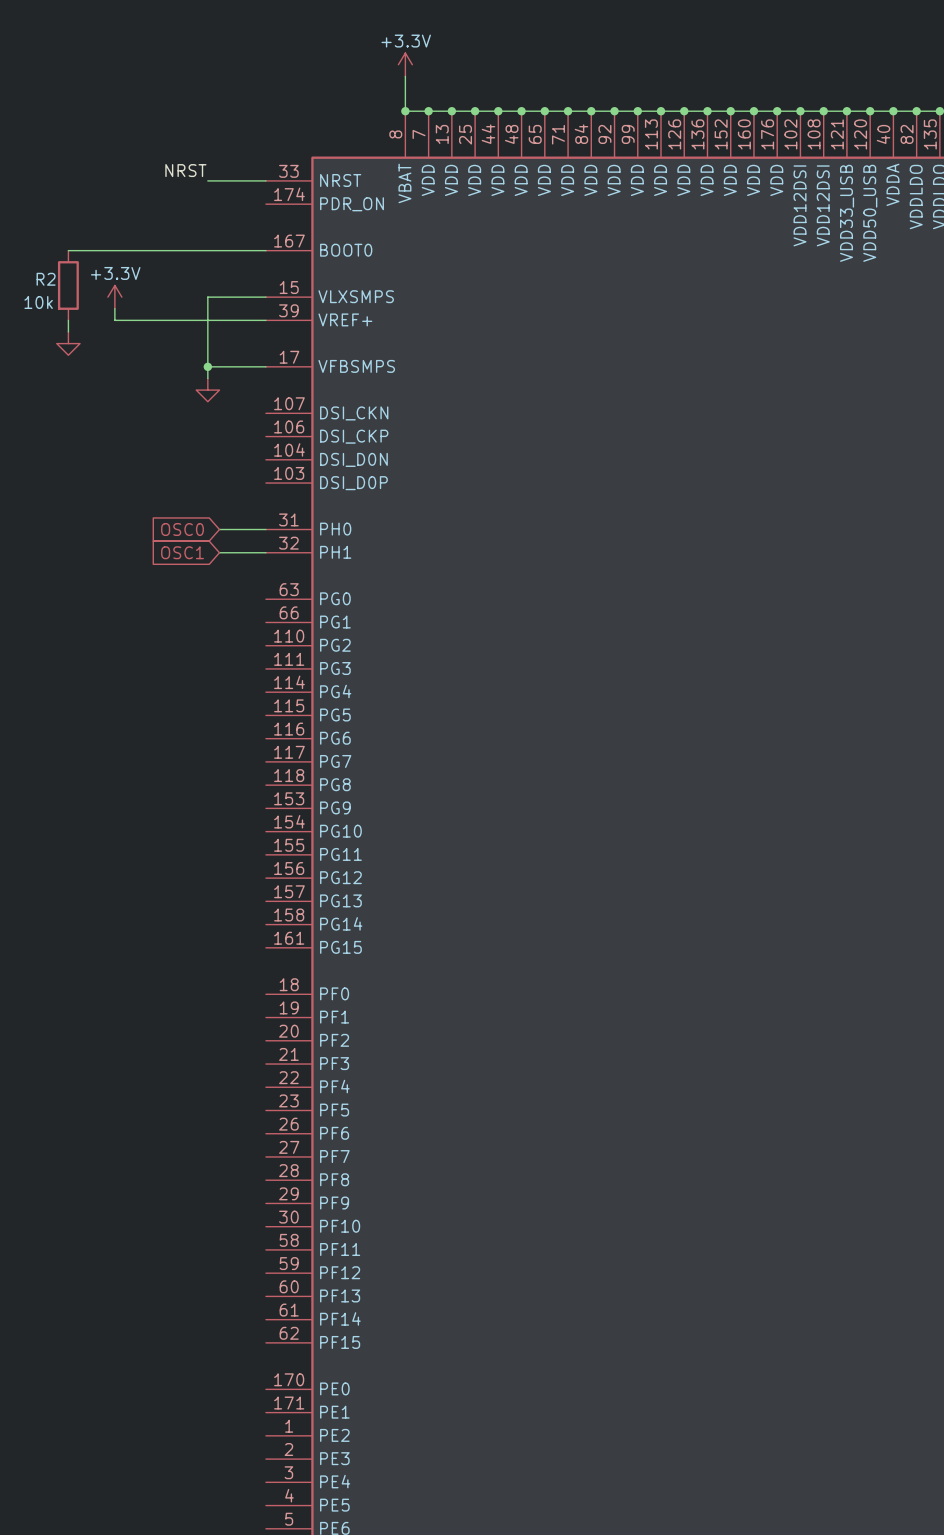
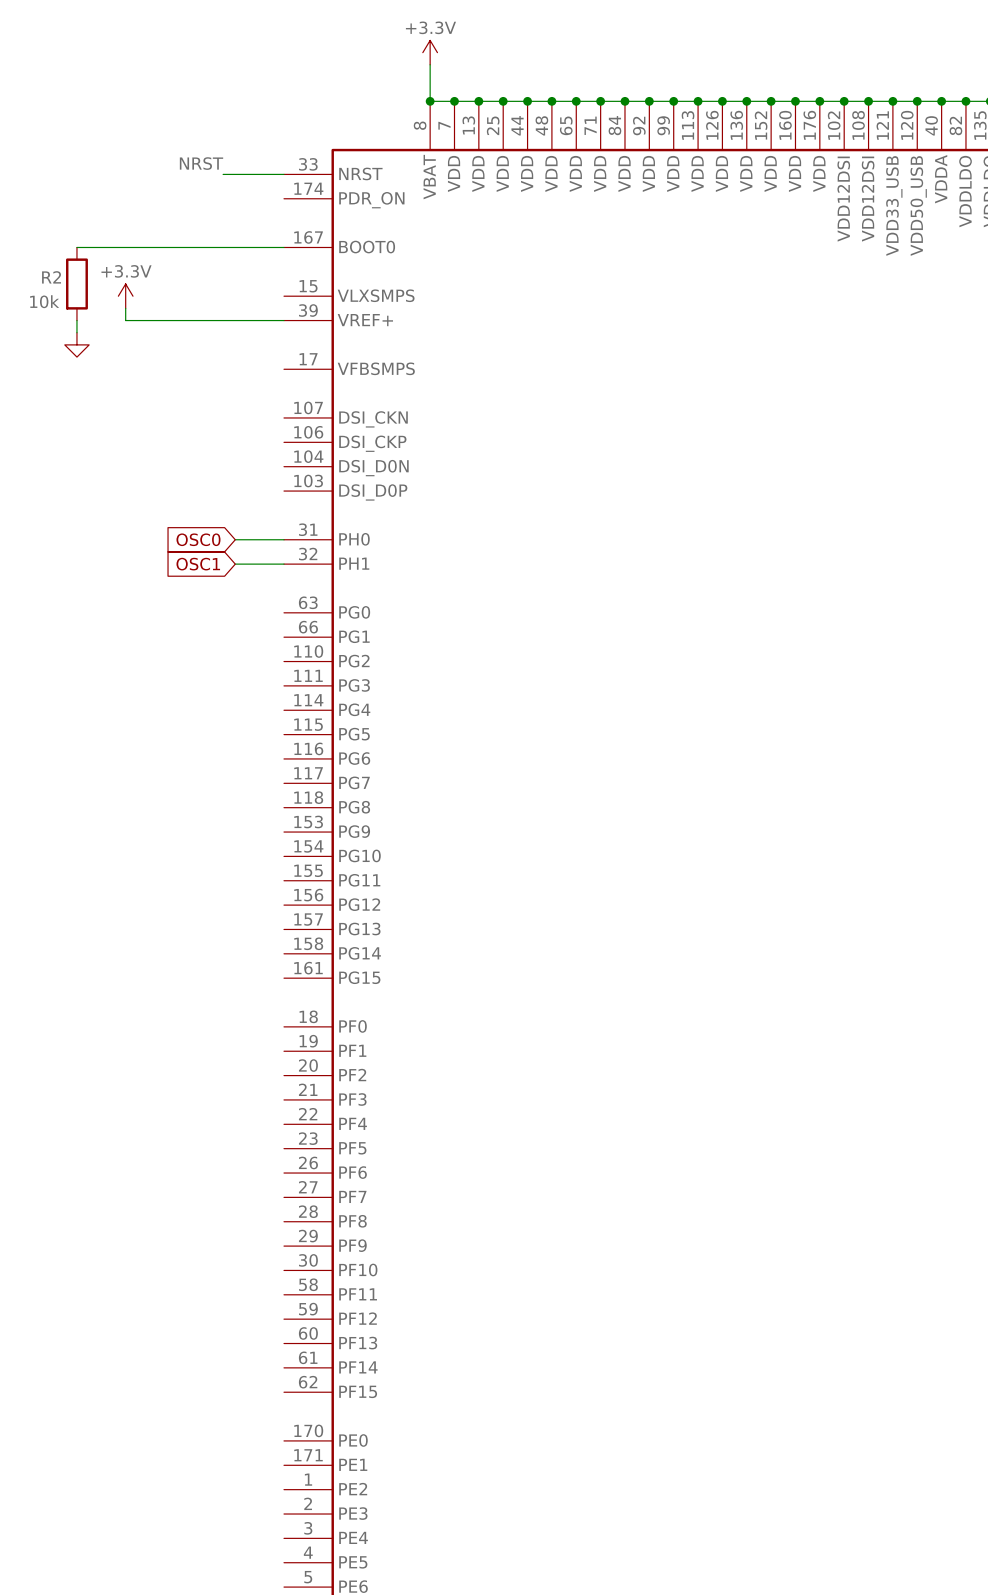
wire: (265, 297) (207, 297) (207, 378) -> none
wire: (207, 366) (265, 366) -> none
junction: (207, 366) -> none
power symbol: (207, 390) -> none

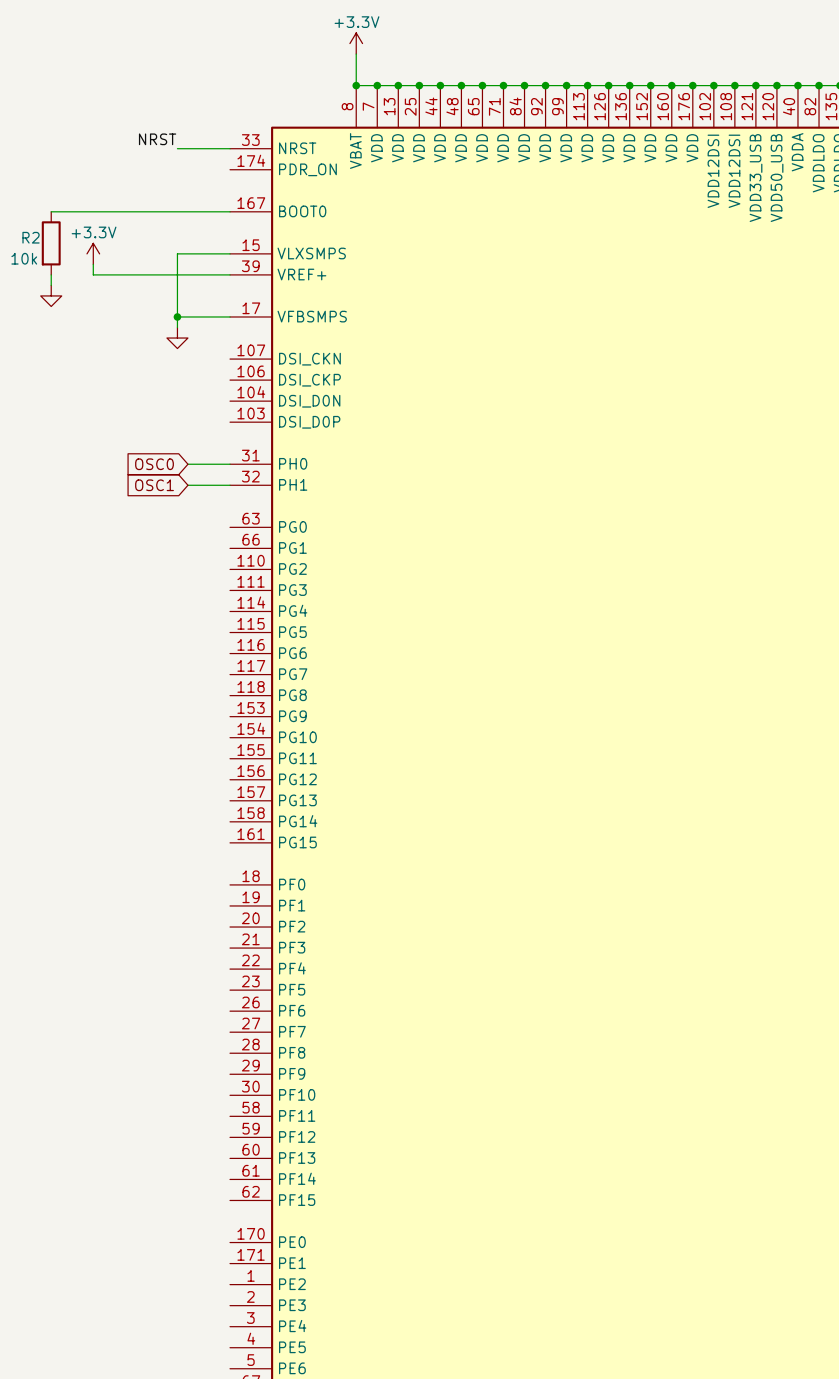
wire: none -> (230, 253) (177, 253) (177, 327)
wire: none -> (177, 316) (230, 316)
junction: none -> (177, 316)
power symbol: none -> (177, 338)

